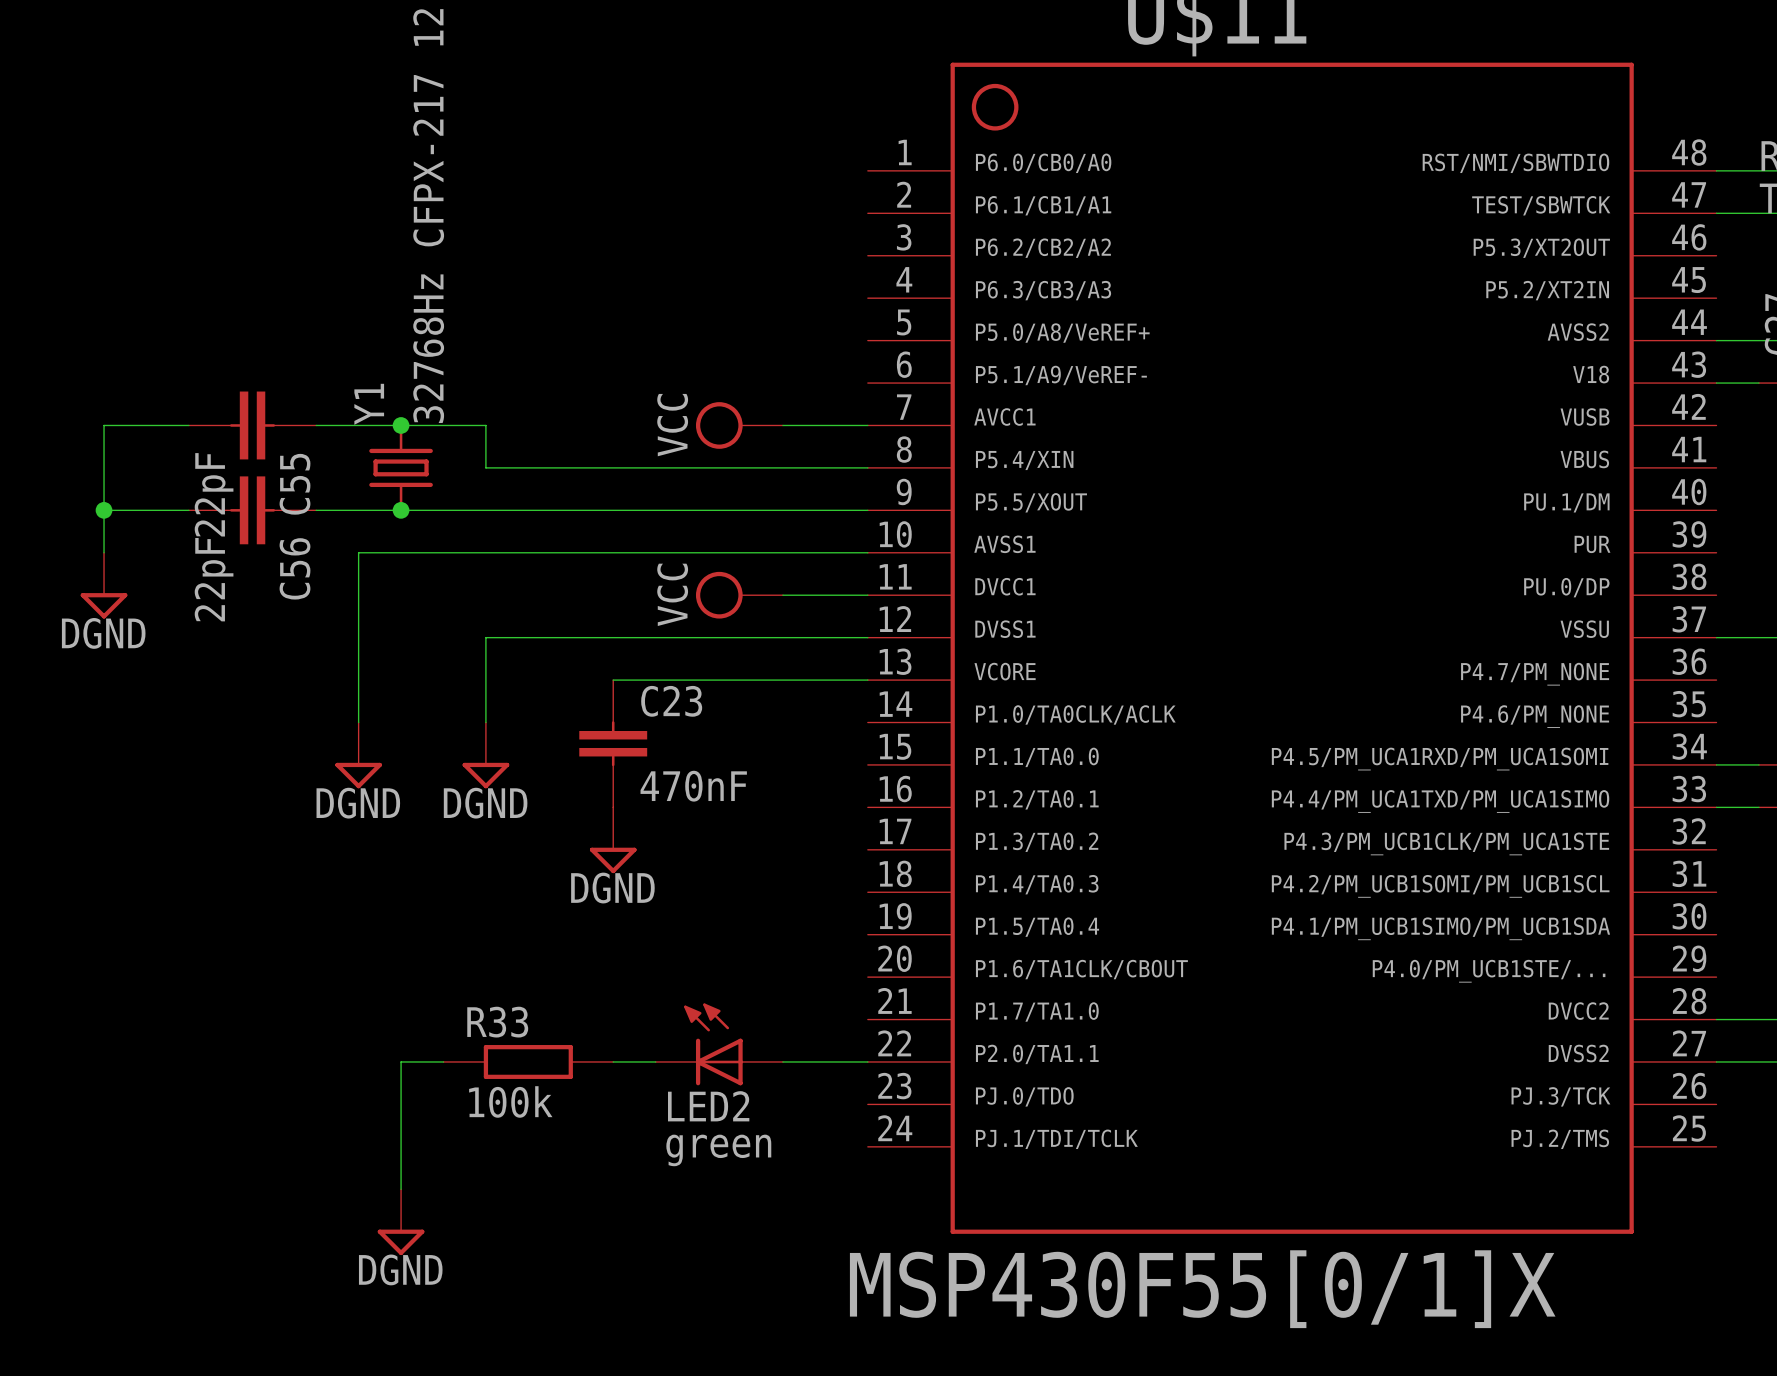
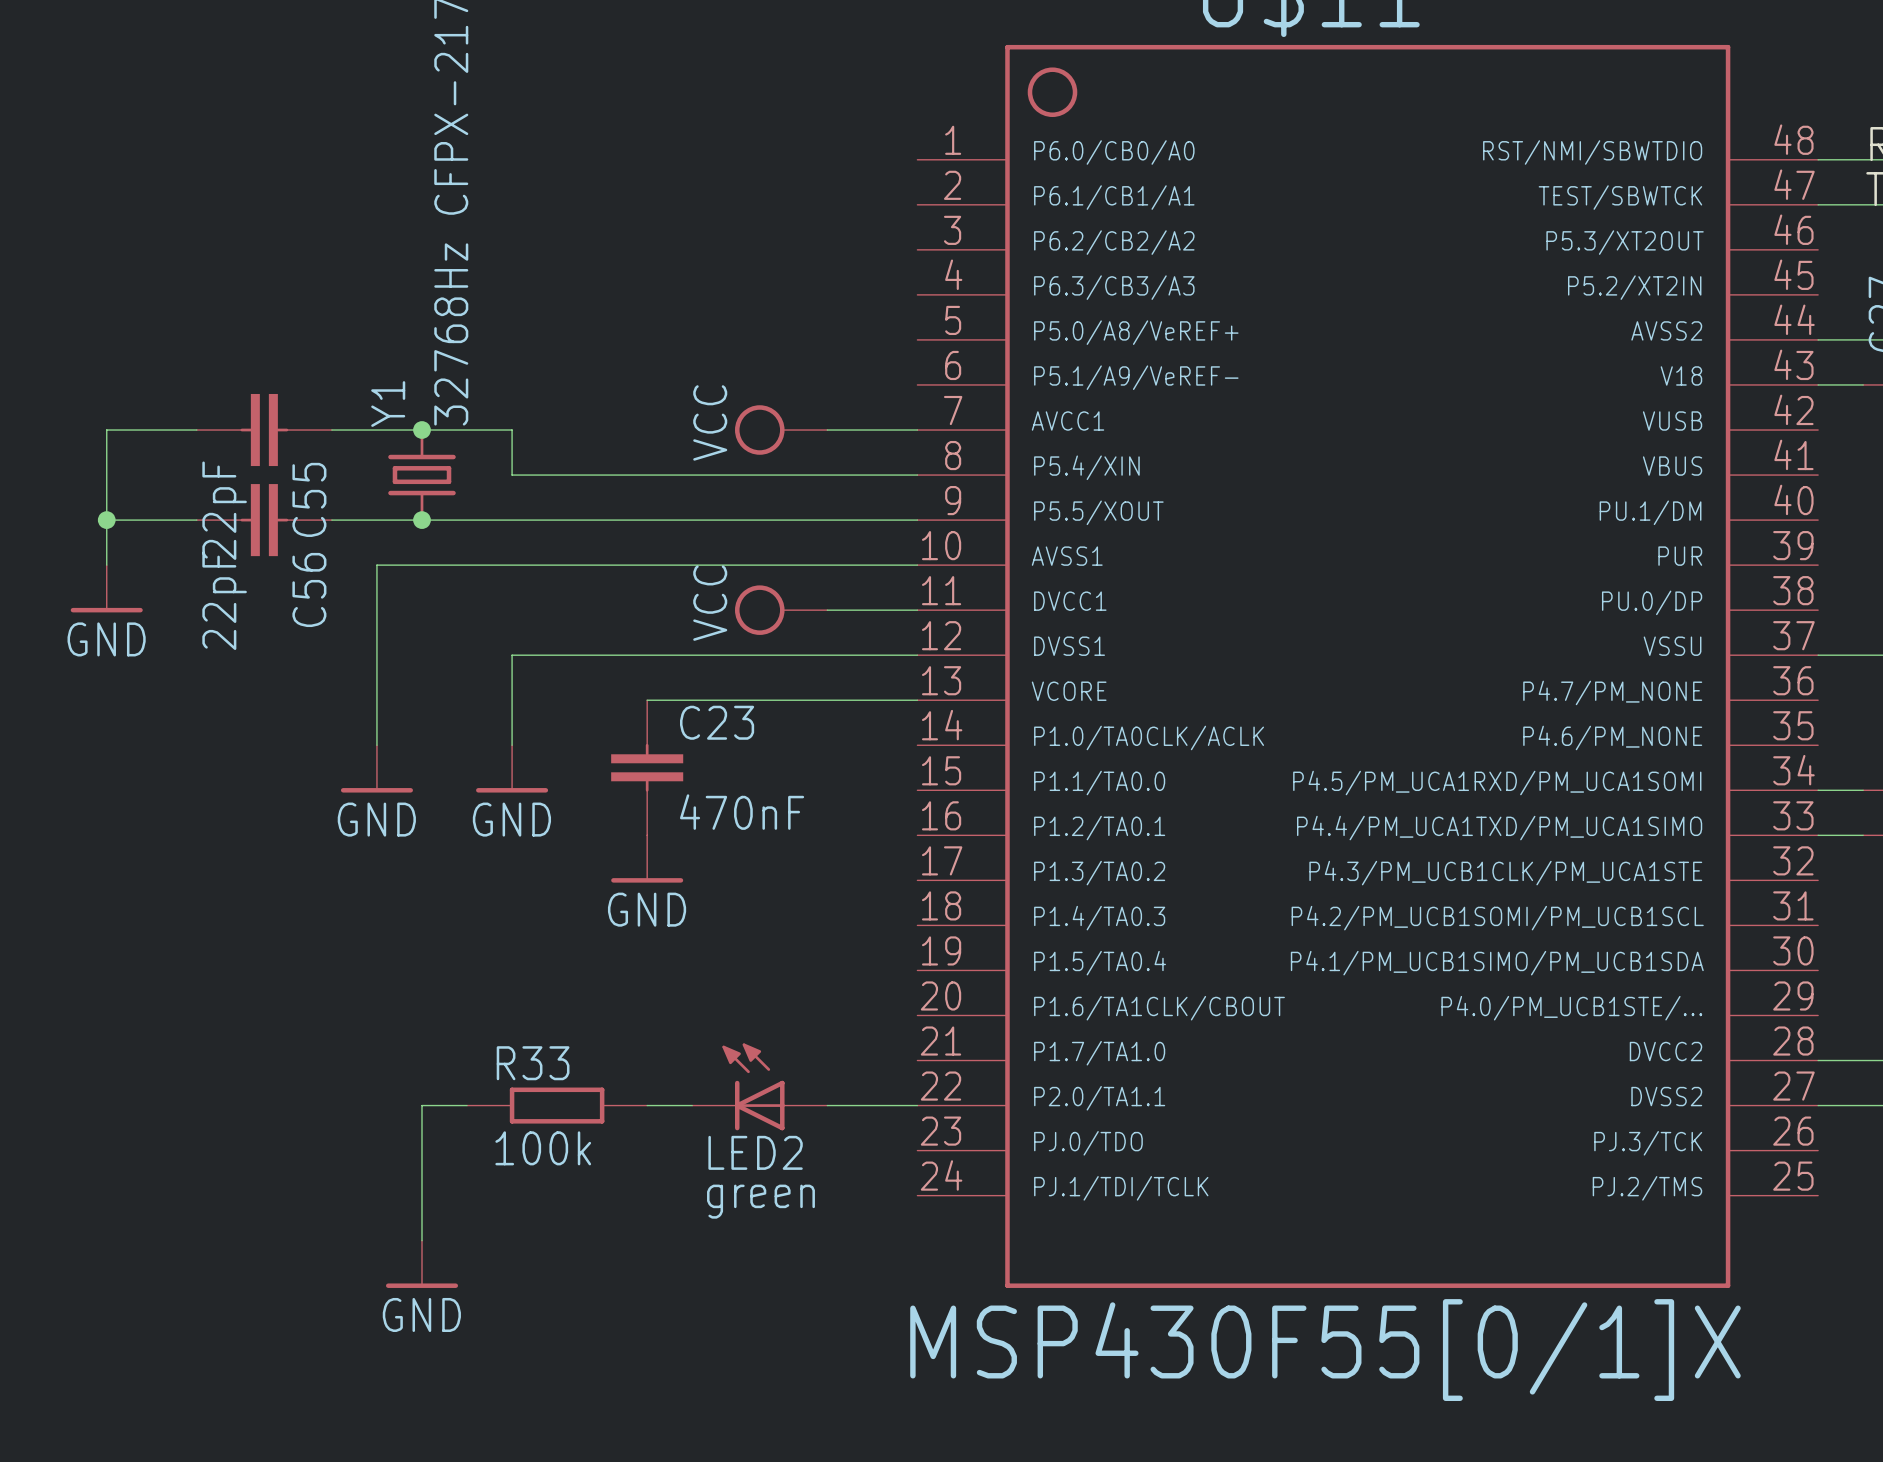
power symbol: DGND (104, 585) -> GND (106, 588)
power symbol: DGND (358, 755) -> GND (376, 768)
power symbol: DGND (485, 755) -> GND (512, 768)
power symbol: DGND (613, 840) -> GND (647, 858)
power symbol: DGND (401, 1222) -> GND (421, 1264)

